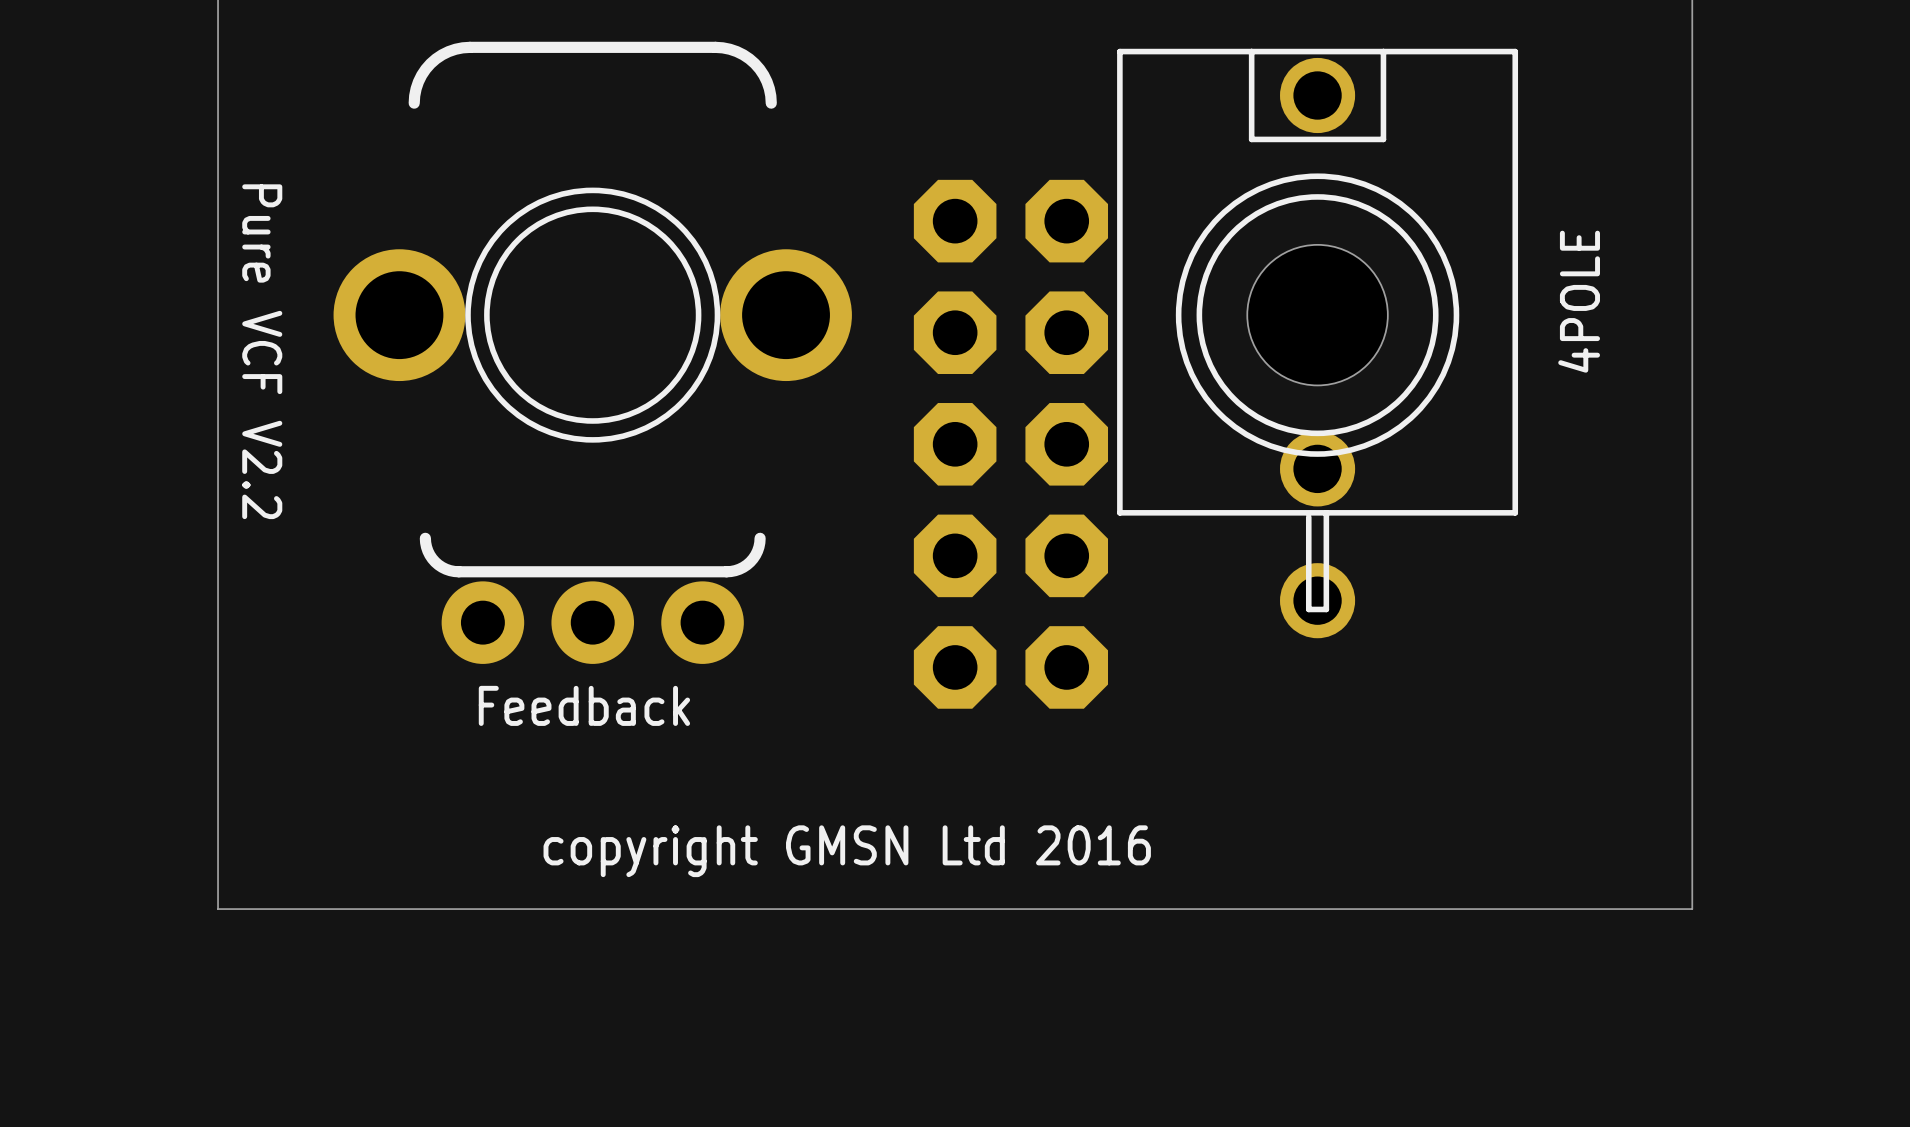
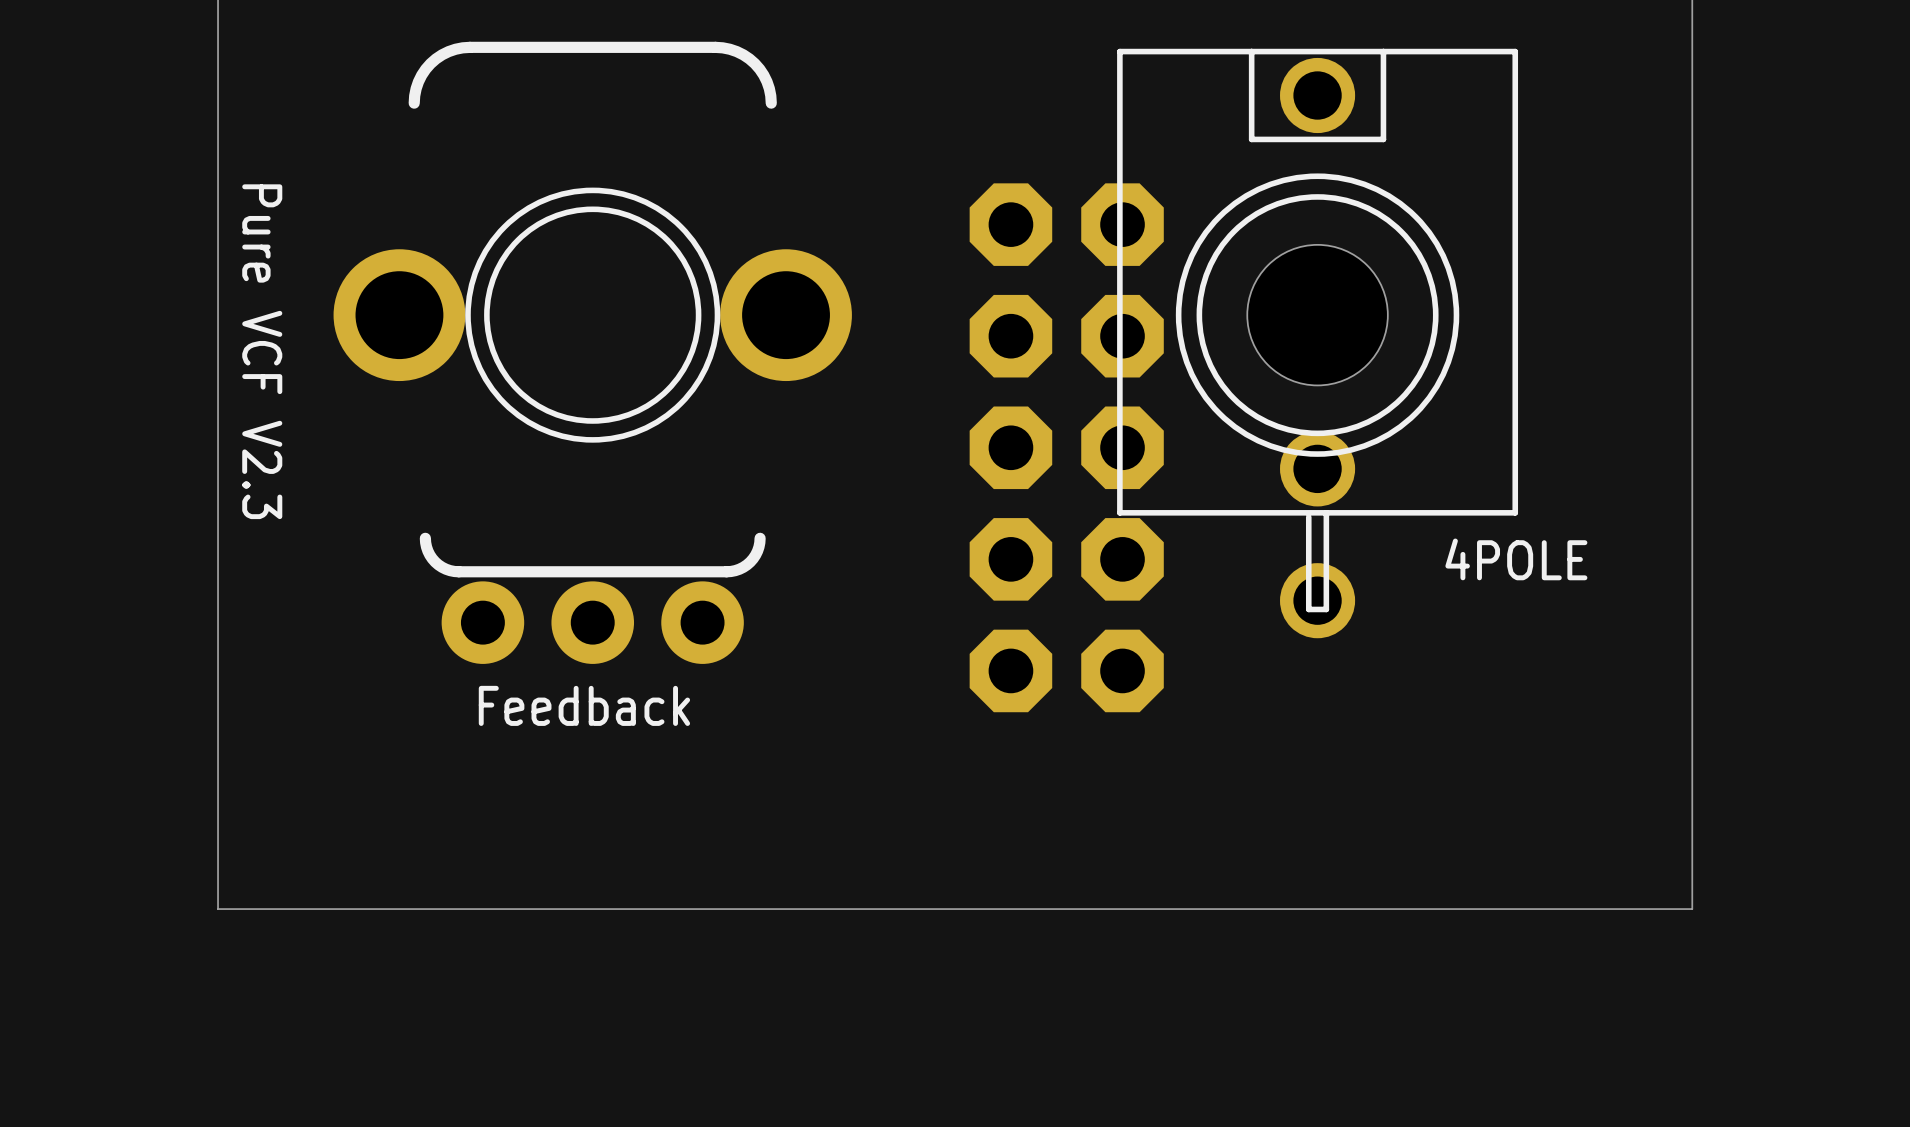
4POLE name rotation: 0° (1579, 301) -> 90° clockwise (1516, 559)
4POLE name position: 4POLE (1579, 301) -> 4POLE (1516, 559)
text: Pure VCF V2.2 (262, 351) -> Pure VCF V2.3 (262, 351)
part position: (1010, 444) -> (1066, 447)
text: copyright GMSN Ltd 2016 (847, 851) -> none

